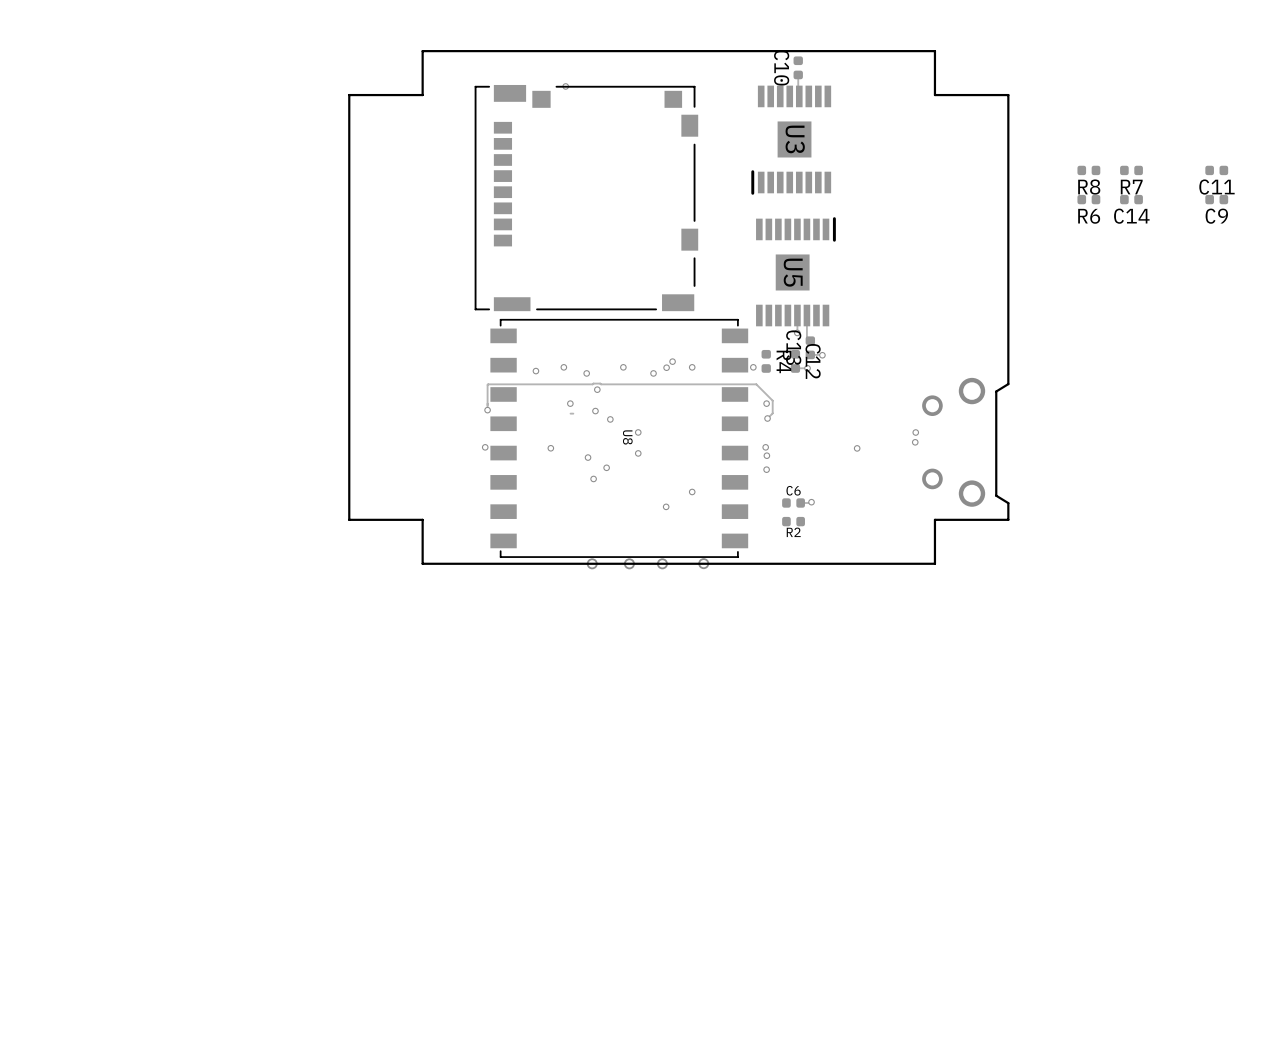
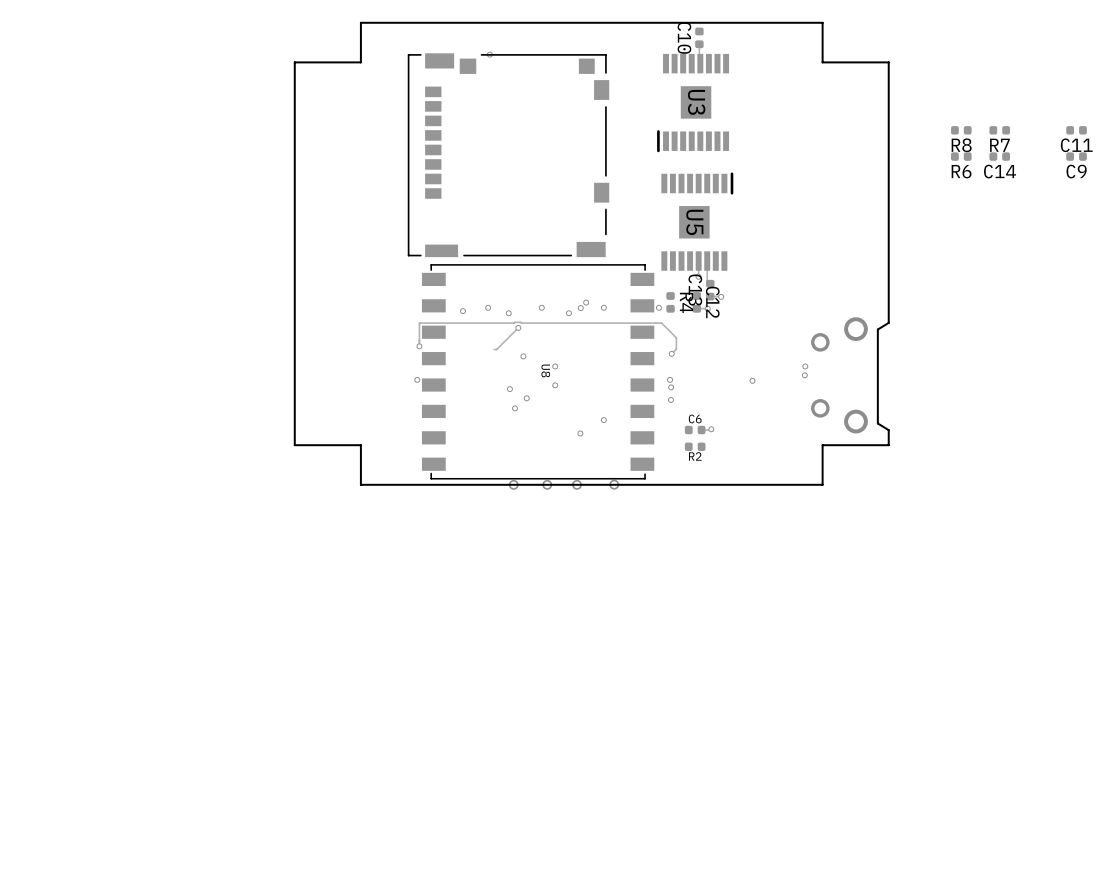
track: none -> (518, 327) (496, 349)
via: (570, 403) -> none
via: (766, 403) -> none
via: (595, 411) -> none
via: (610, 419) -> none
via: none -> (523, 356)
via: (550, 448) -> none

